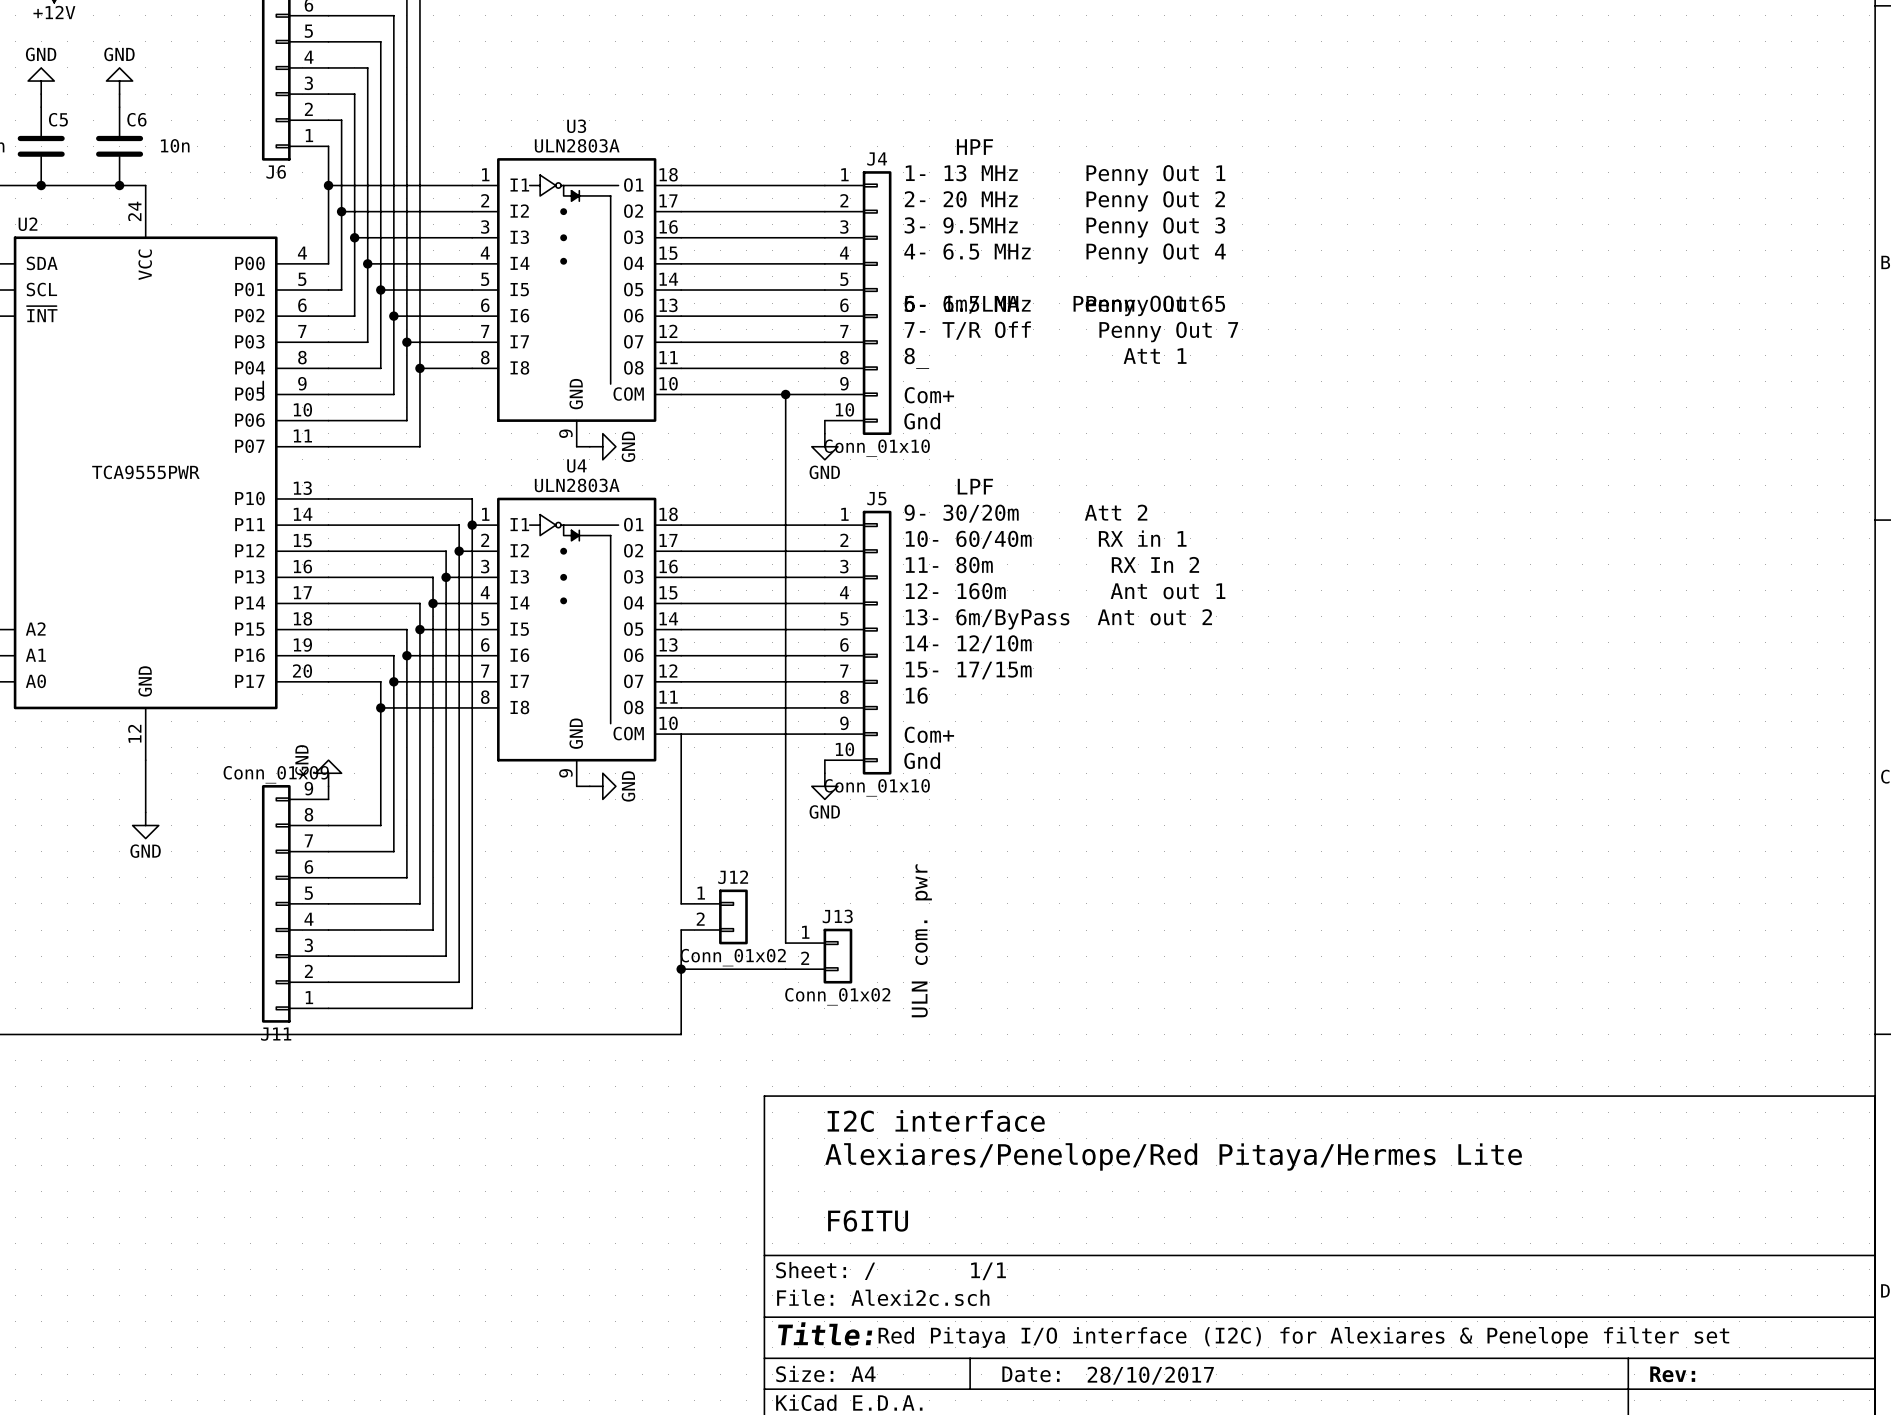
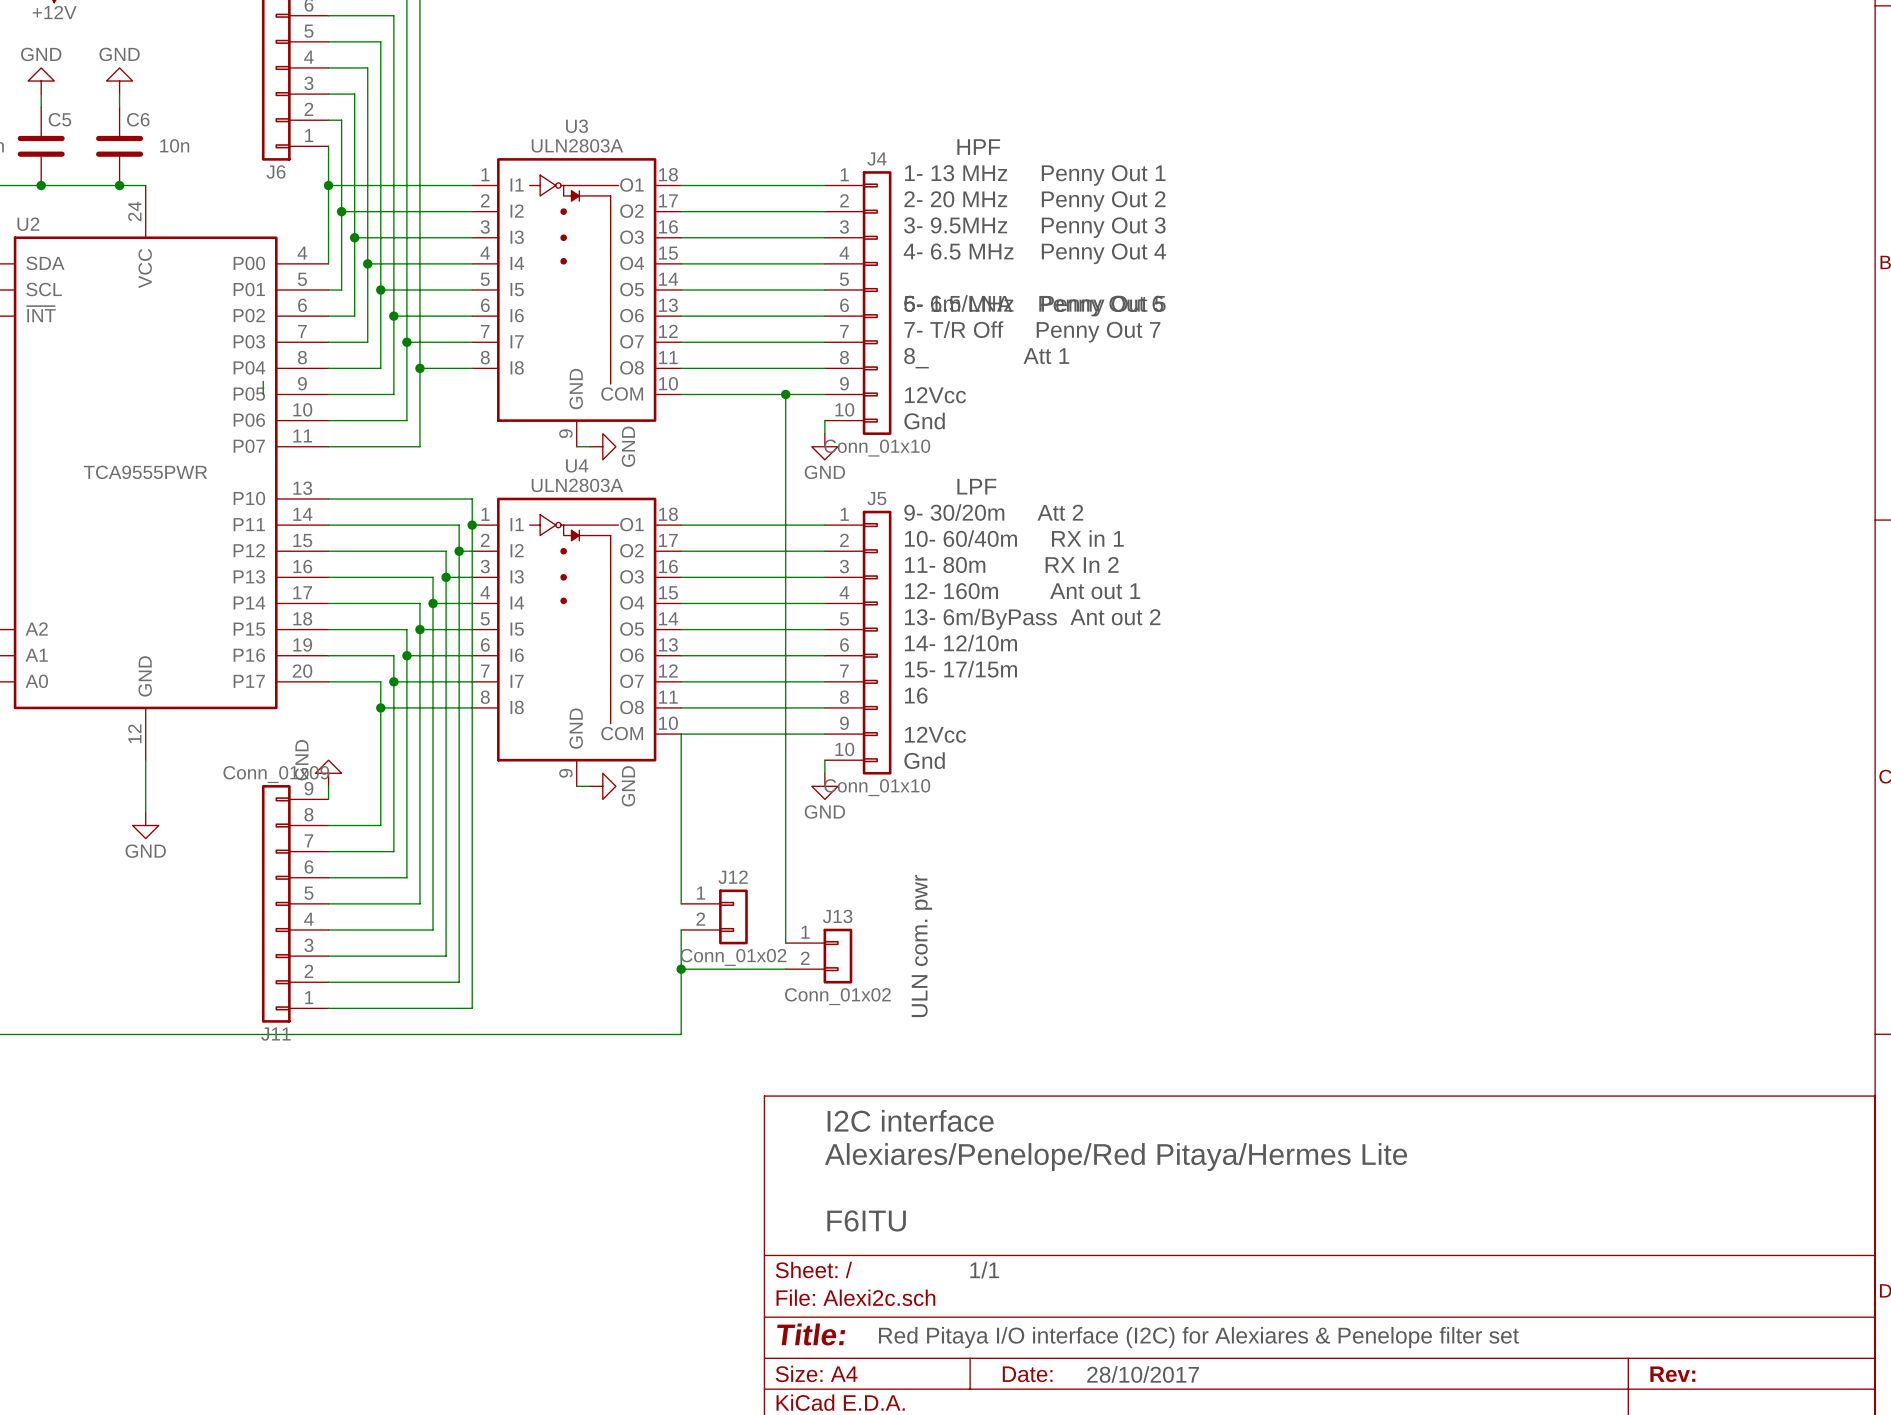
text: Com+ (929, 395) -> 12Vcc (935, 395)
text: Com+ (929, 734) -> 12Vcc (935, 734)

